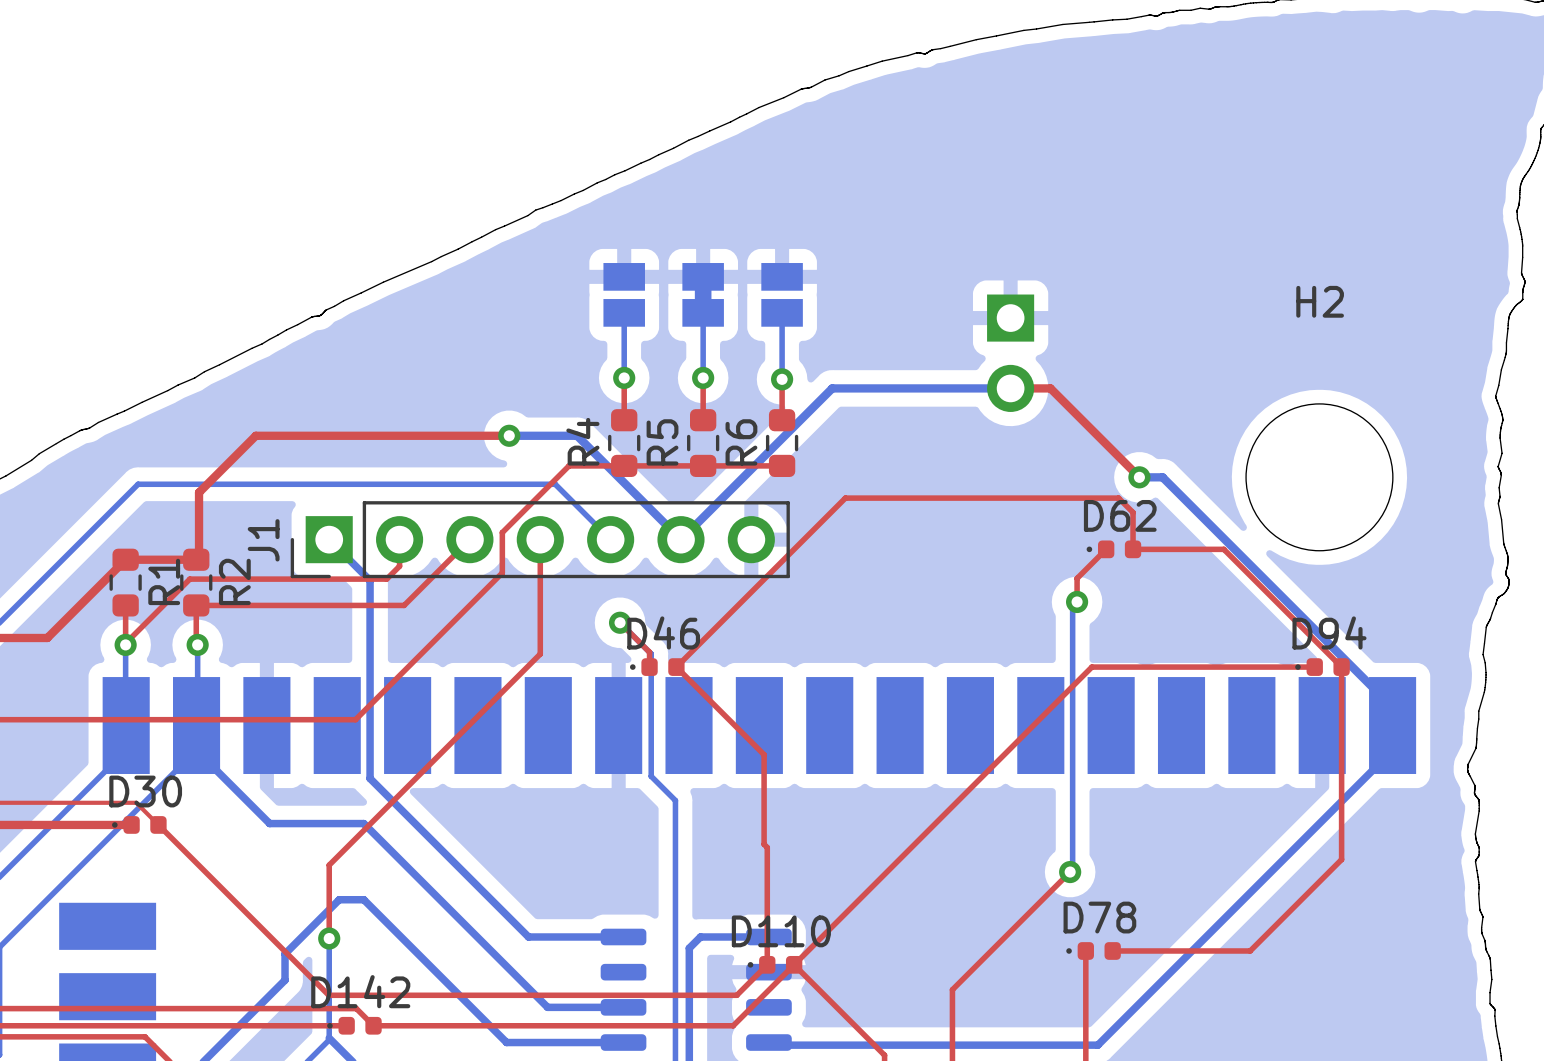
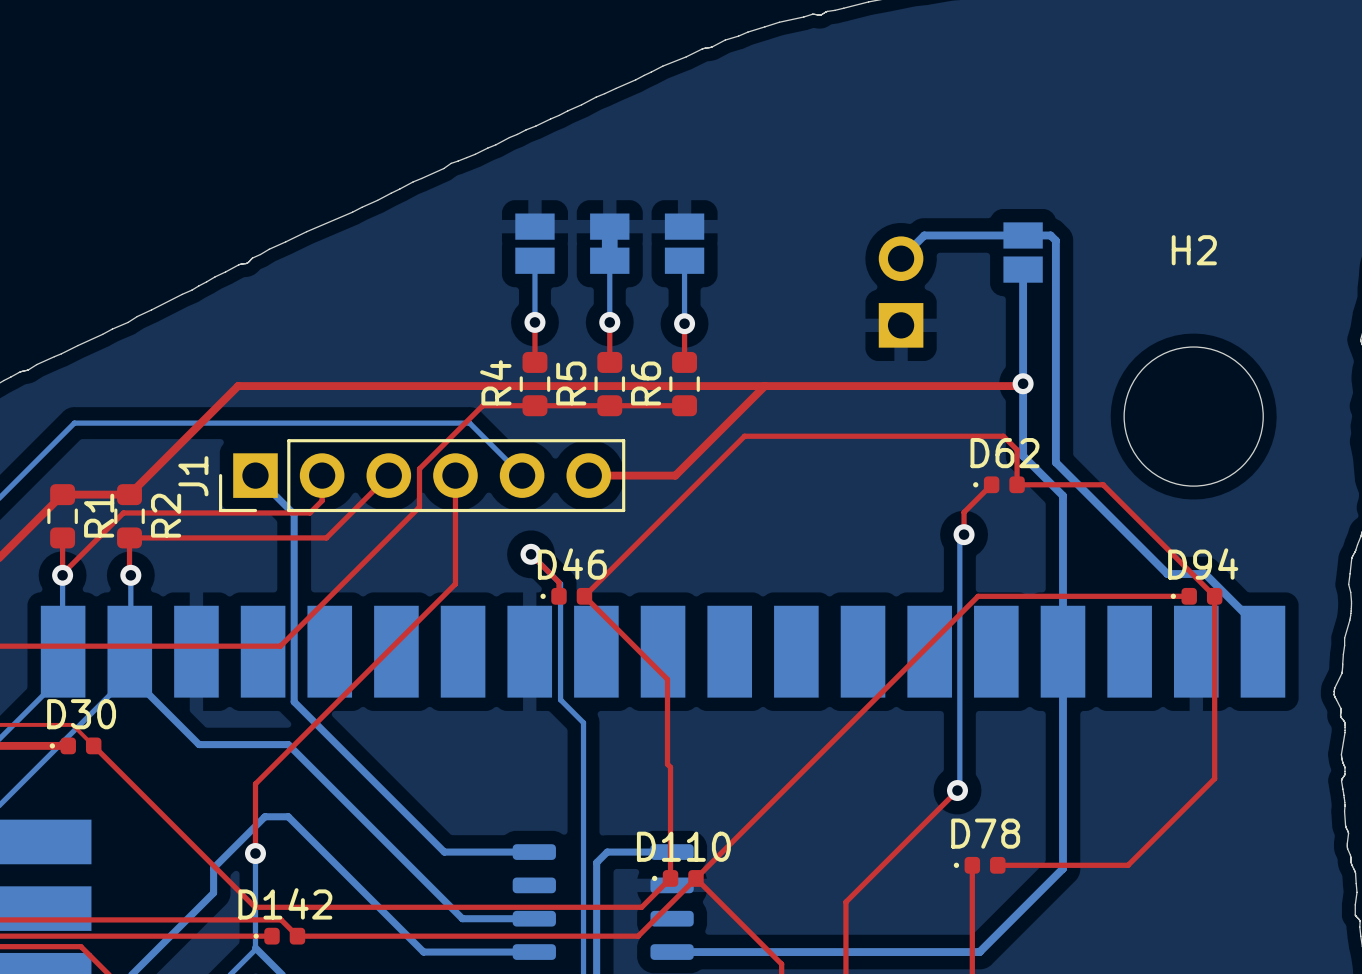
part: none -> (1023, 252)
part rotation: 0° (1010, 353) -> 180° (901, 292)
top track: (1010, 388) (1050, 388) (1139, 477) -> none
bottom track: (1010, 388) (832, 388) (680, 539) (577, 435) (509, 435) -> none
top track: (509, 435) (255, 435) (199, 492) (199, 556) -> (1023, 383) (1020, 386) (238, 386) (132, 492)
via: (509, 435) -> none
top track: none -> (764, 386) (675, 475) (588, 475)
bottom track: (1139, 477) (1162, 477) (1392, 707) -> (901, 258) (924, 235) (1050, 235) (1055, 240) (1055, 462) (1167, 574) (1205, 574) (1262, 631) (1262, 634)
via position: (1139, 477) -> (1023, 383)
J1 footprint: [290, 501, 790, 579] -> [219, 439, 626, 513]
bottom track: (1392, 750) (1097, 1045) (778, 1045) (775, 1042) -> (1023, 269) (1023, 455) (1062, 495) (1062, 868) (979, 952) (678, 952)

